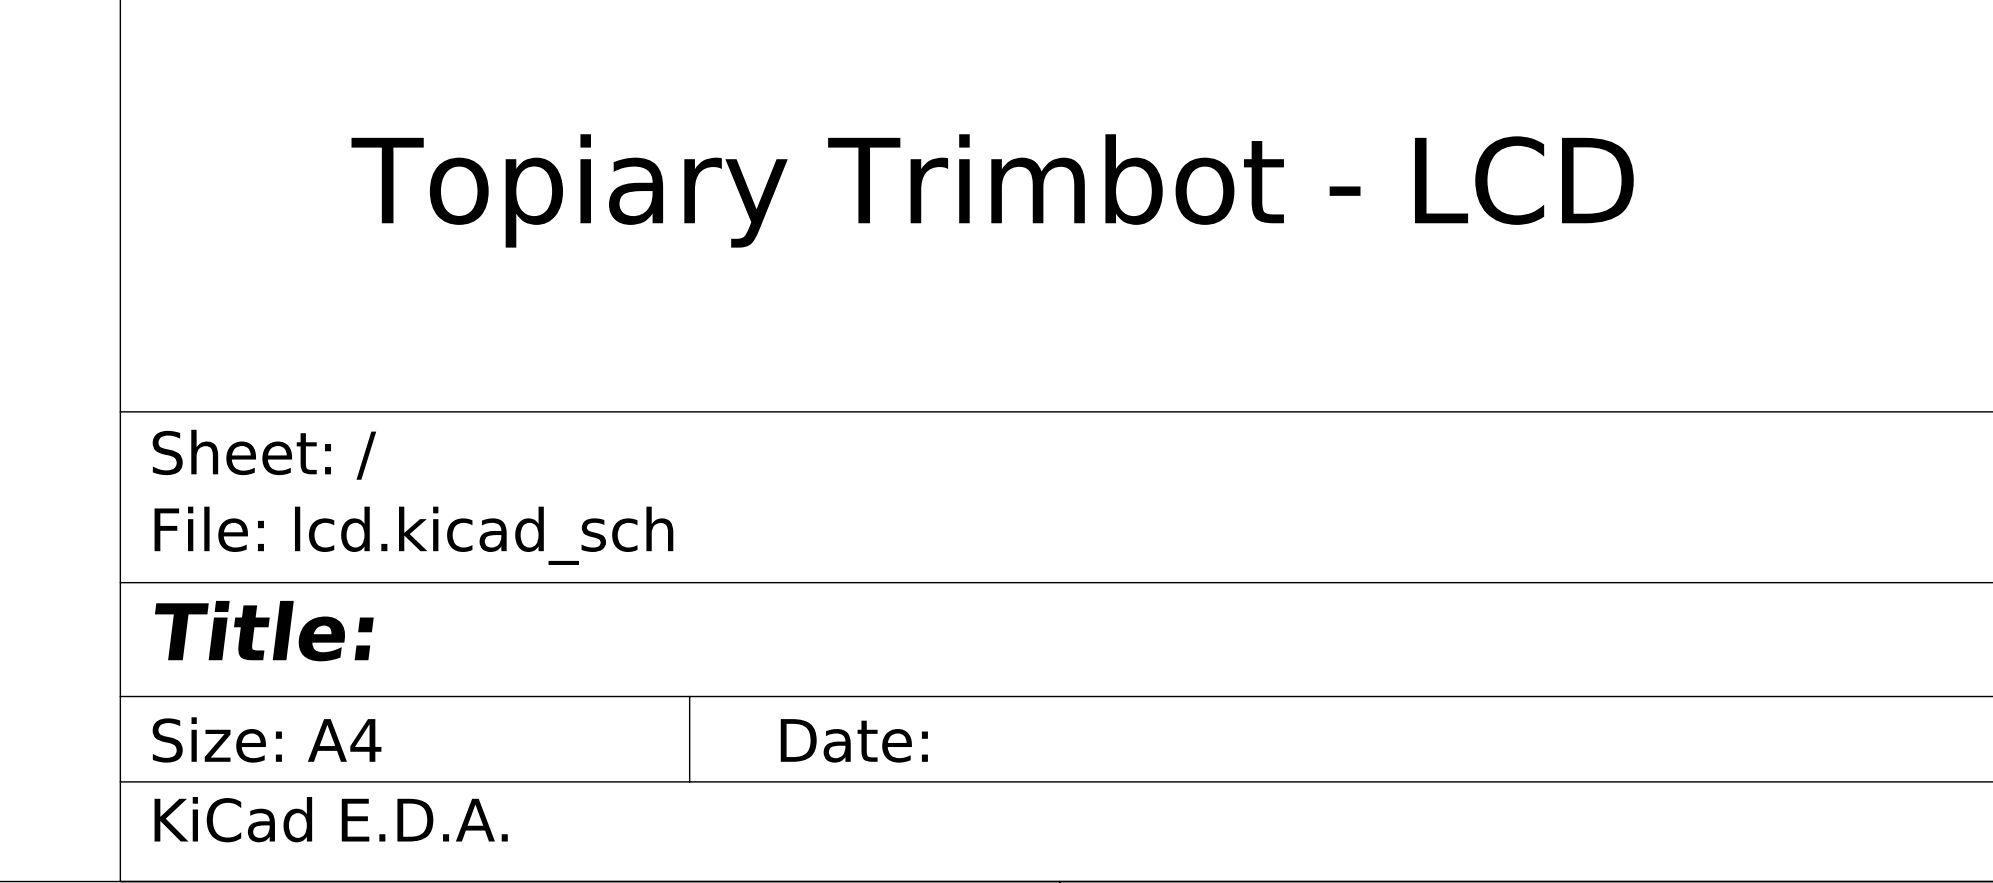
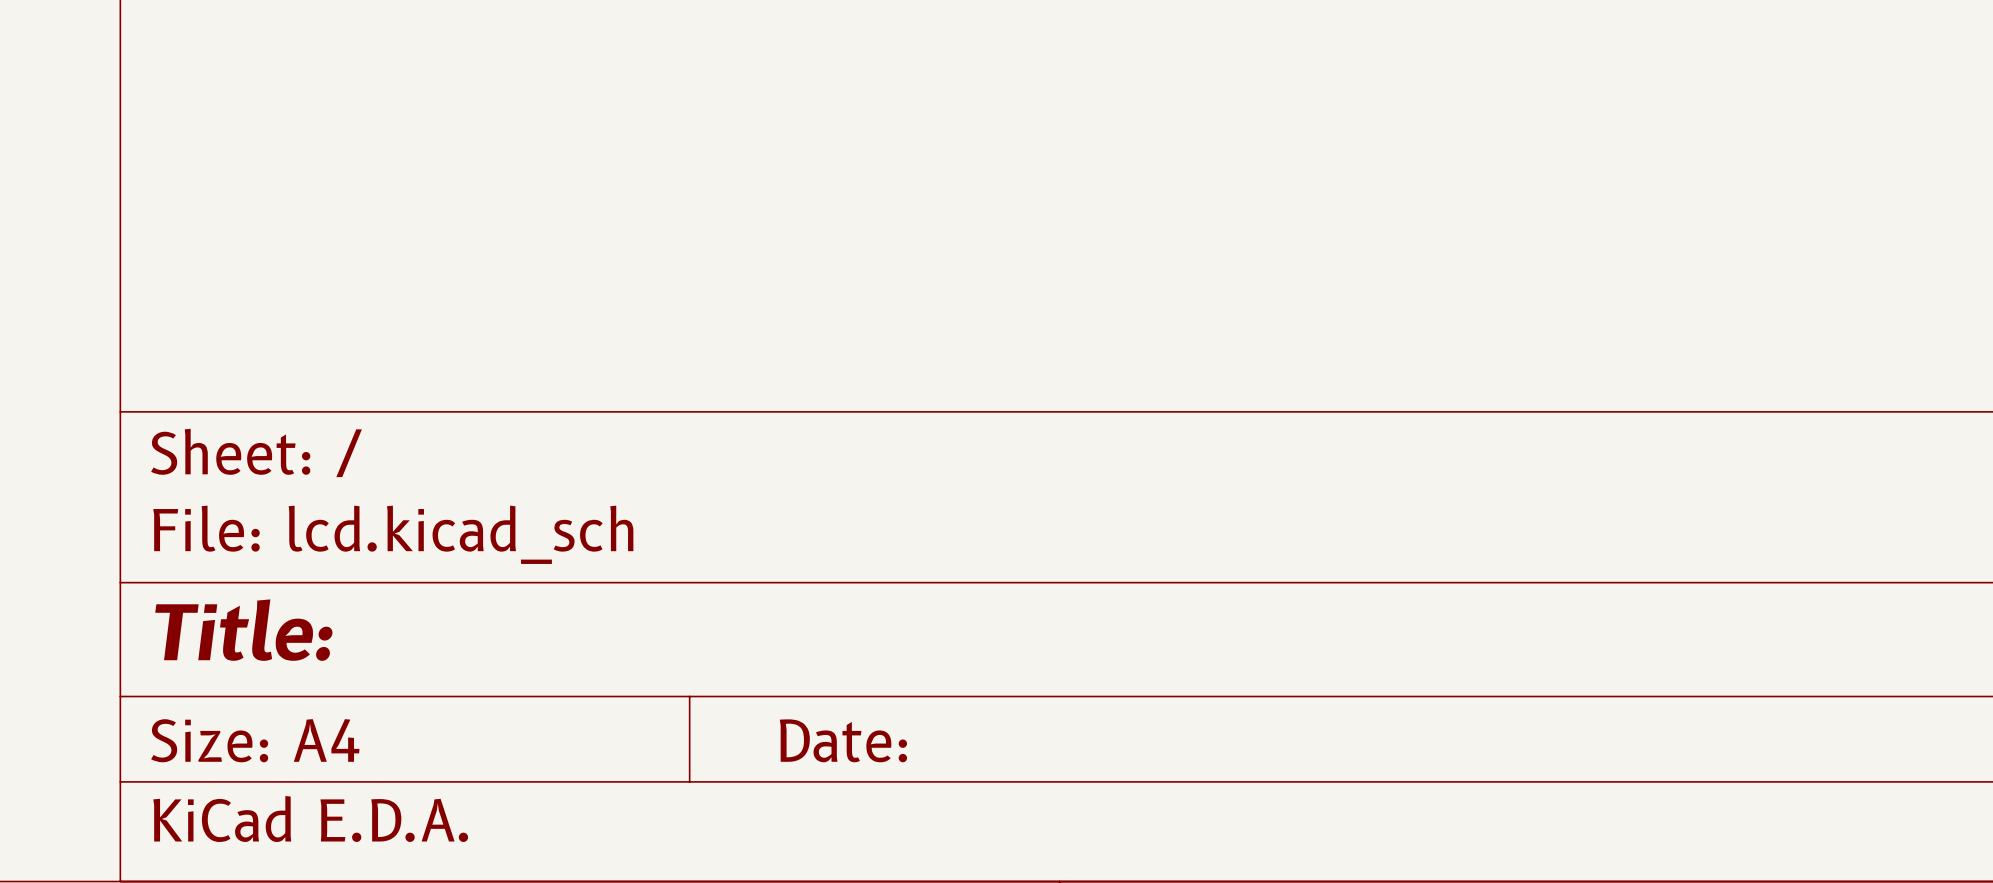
text: Topiary Trimbot - LCD (992, 190) -> none

